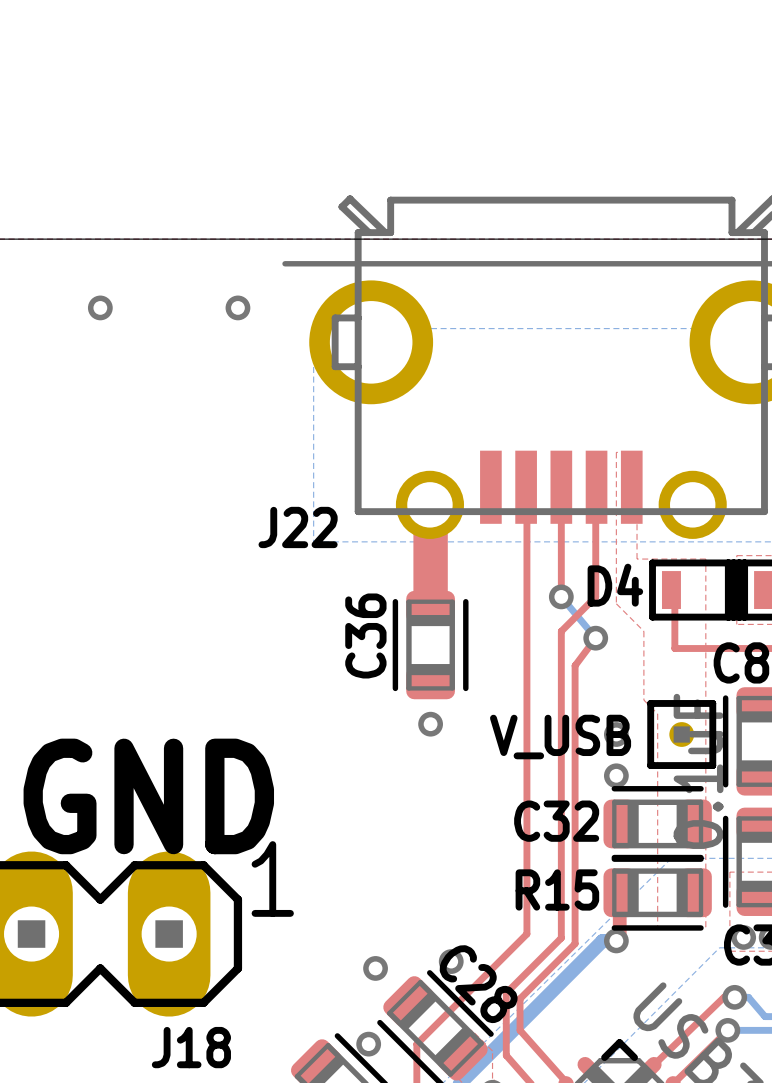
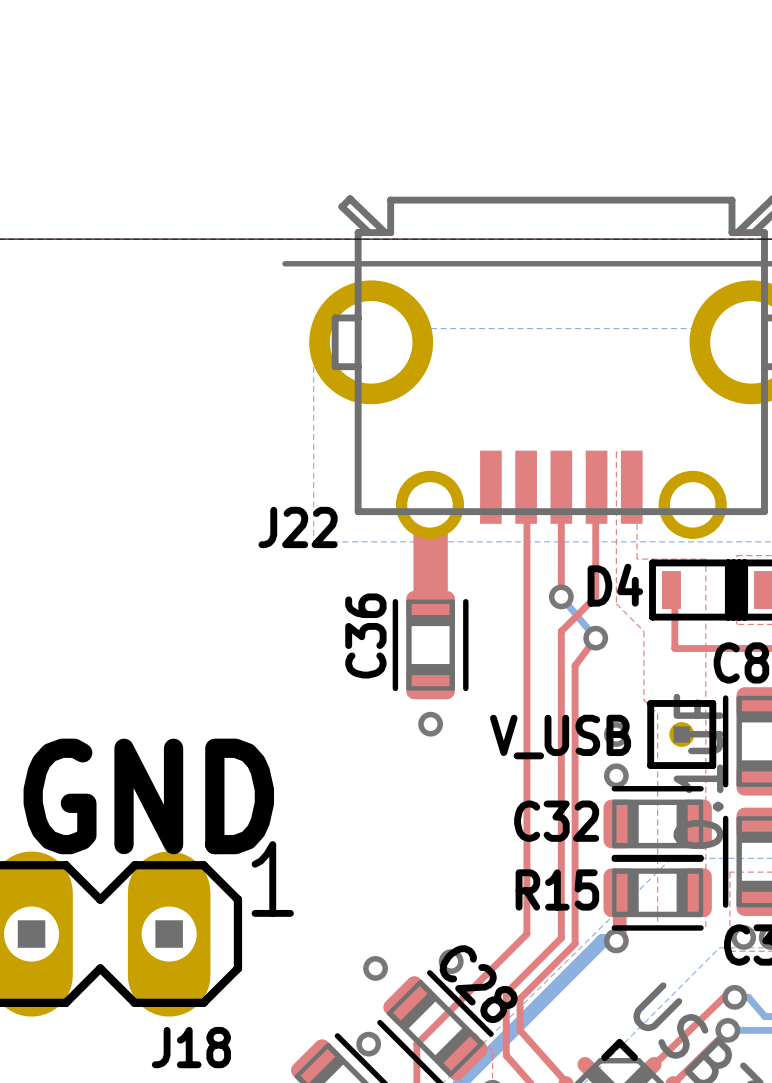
via: (100, 307) -> none
via: (237, 307) -> none

